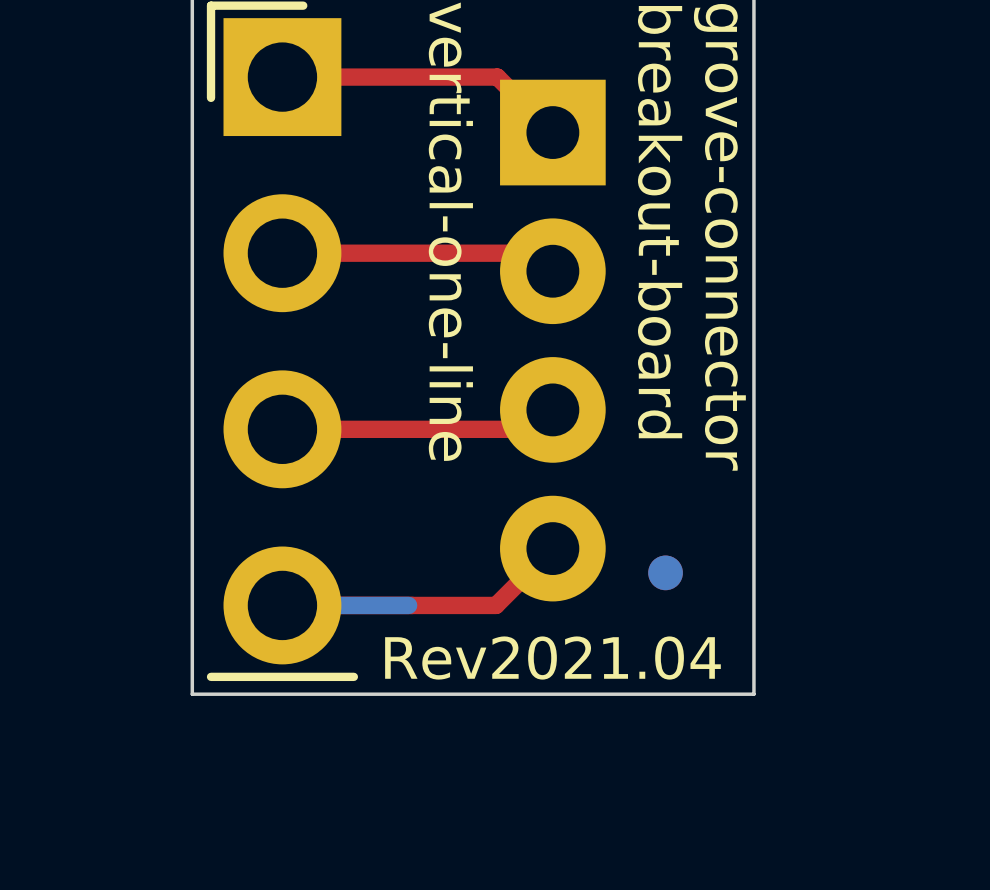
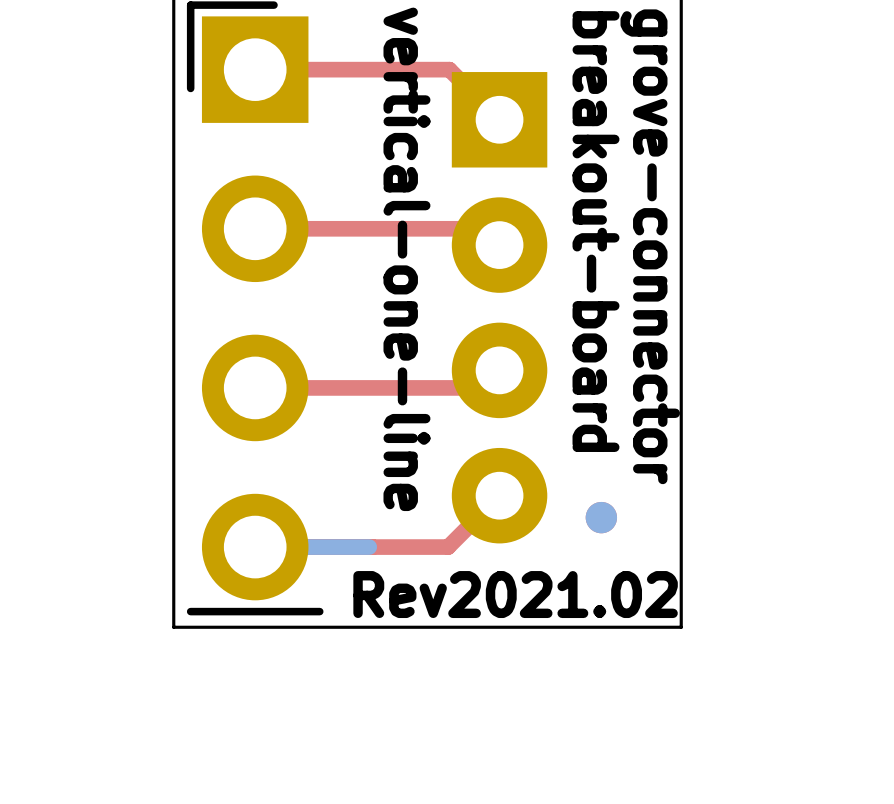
text: Rev2021.04 (552, 658) -> Rev2021.02 (515, 594)

